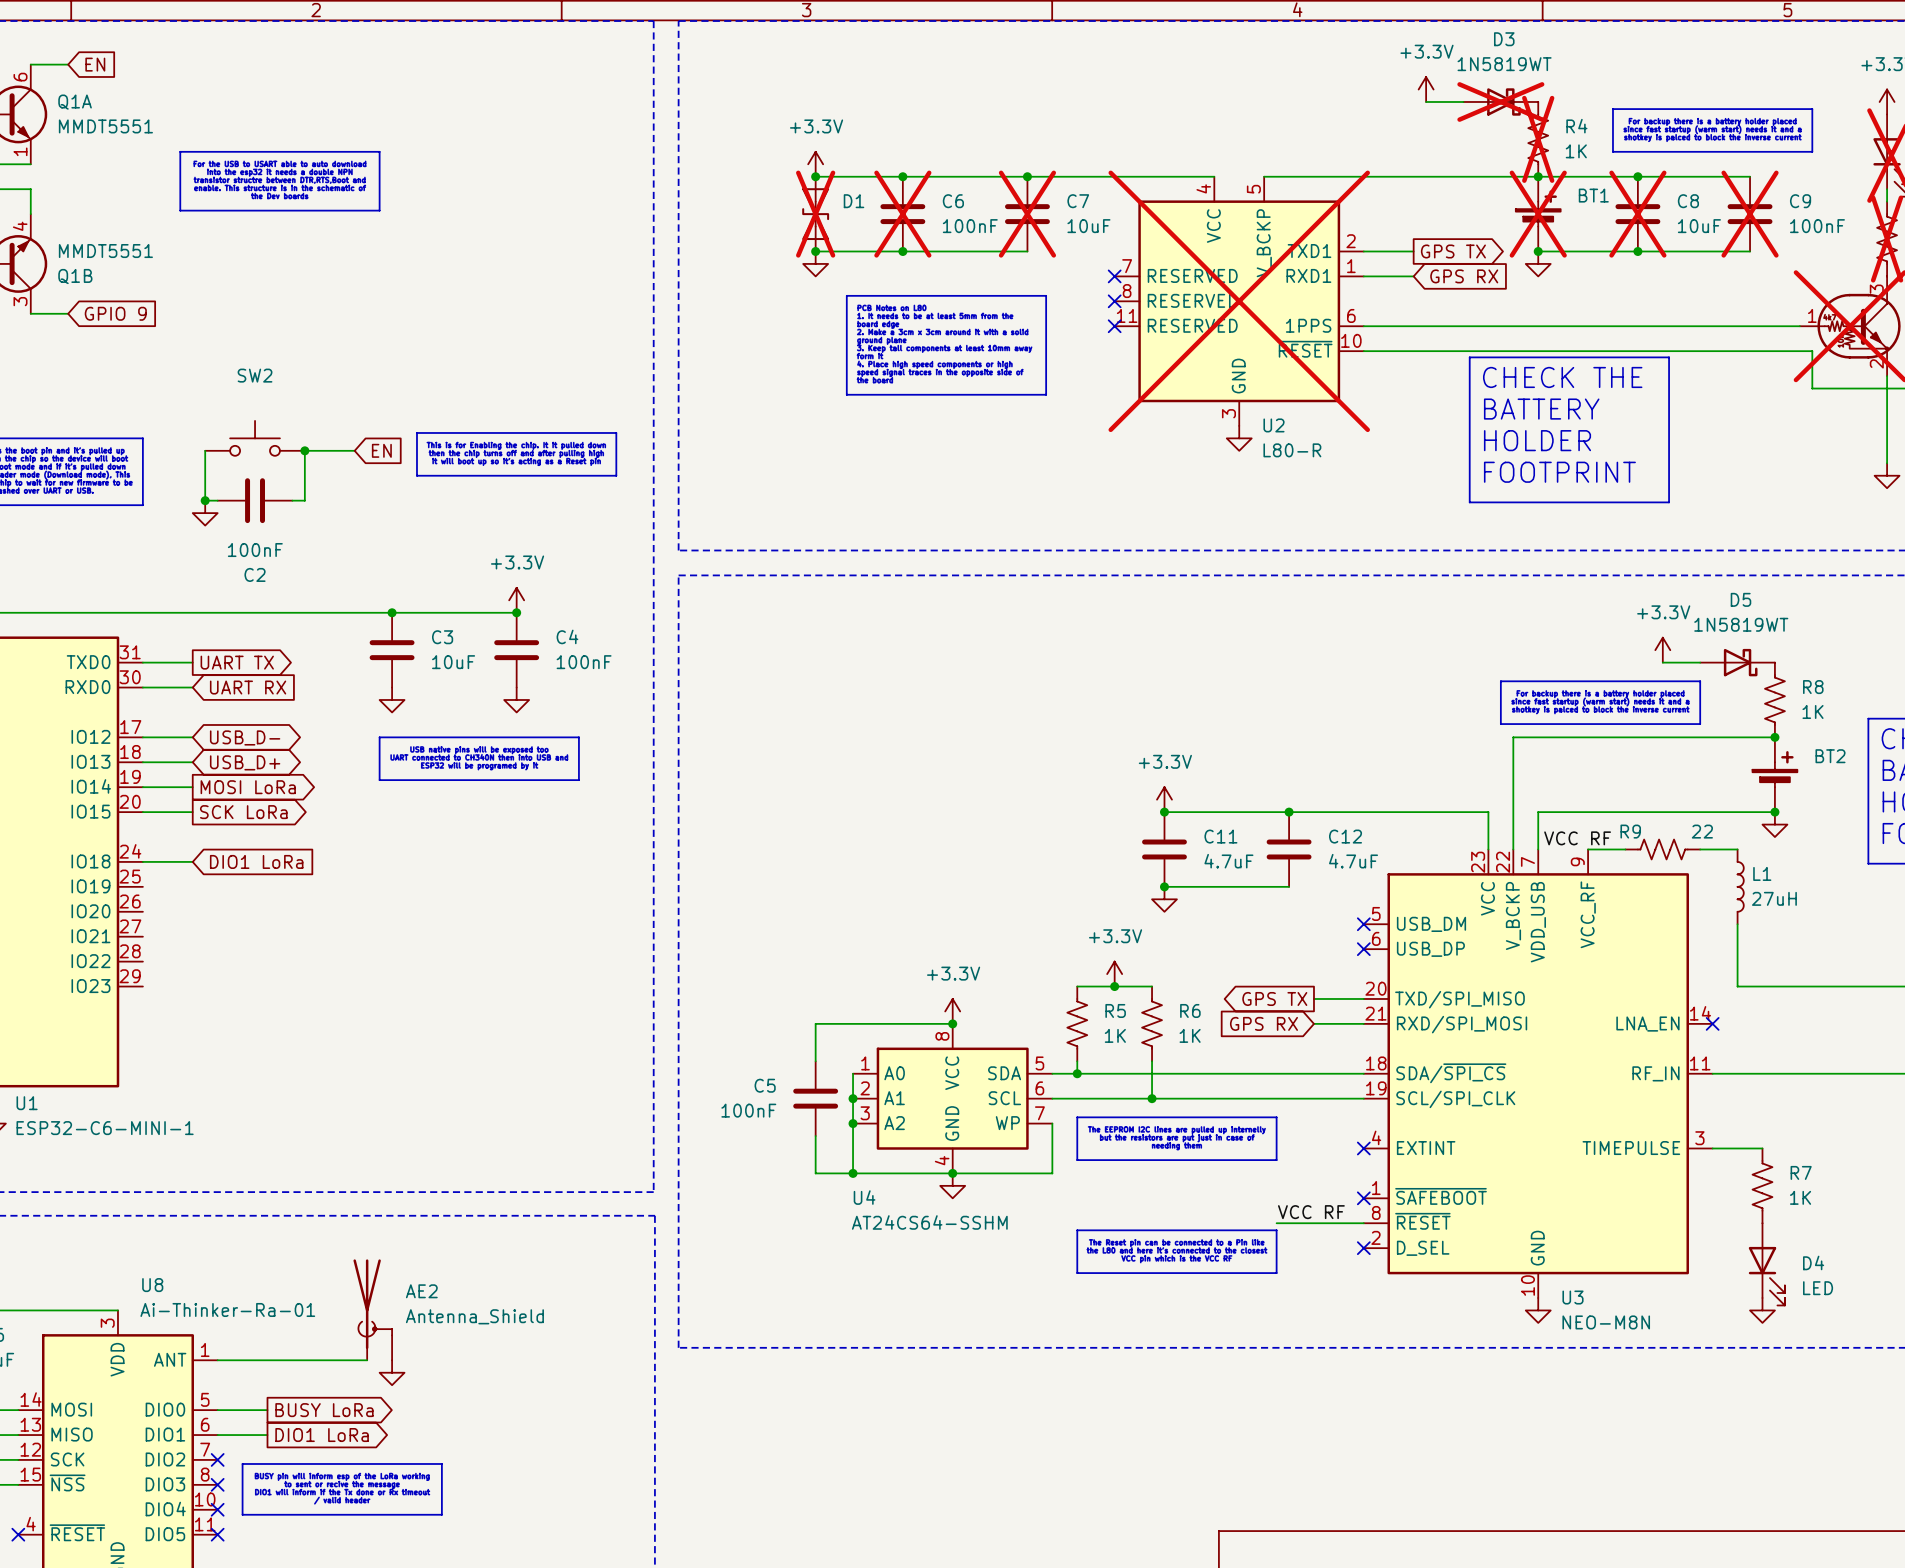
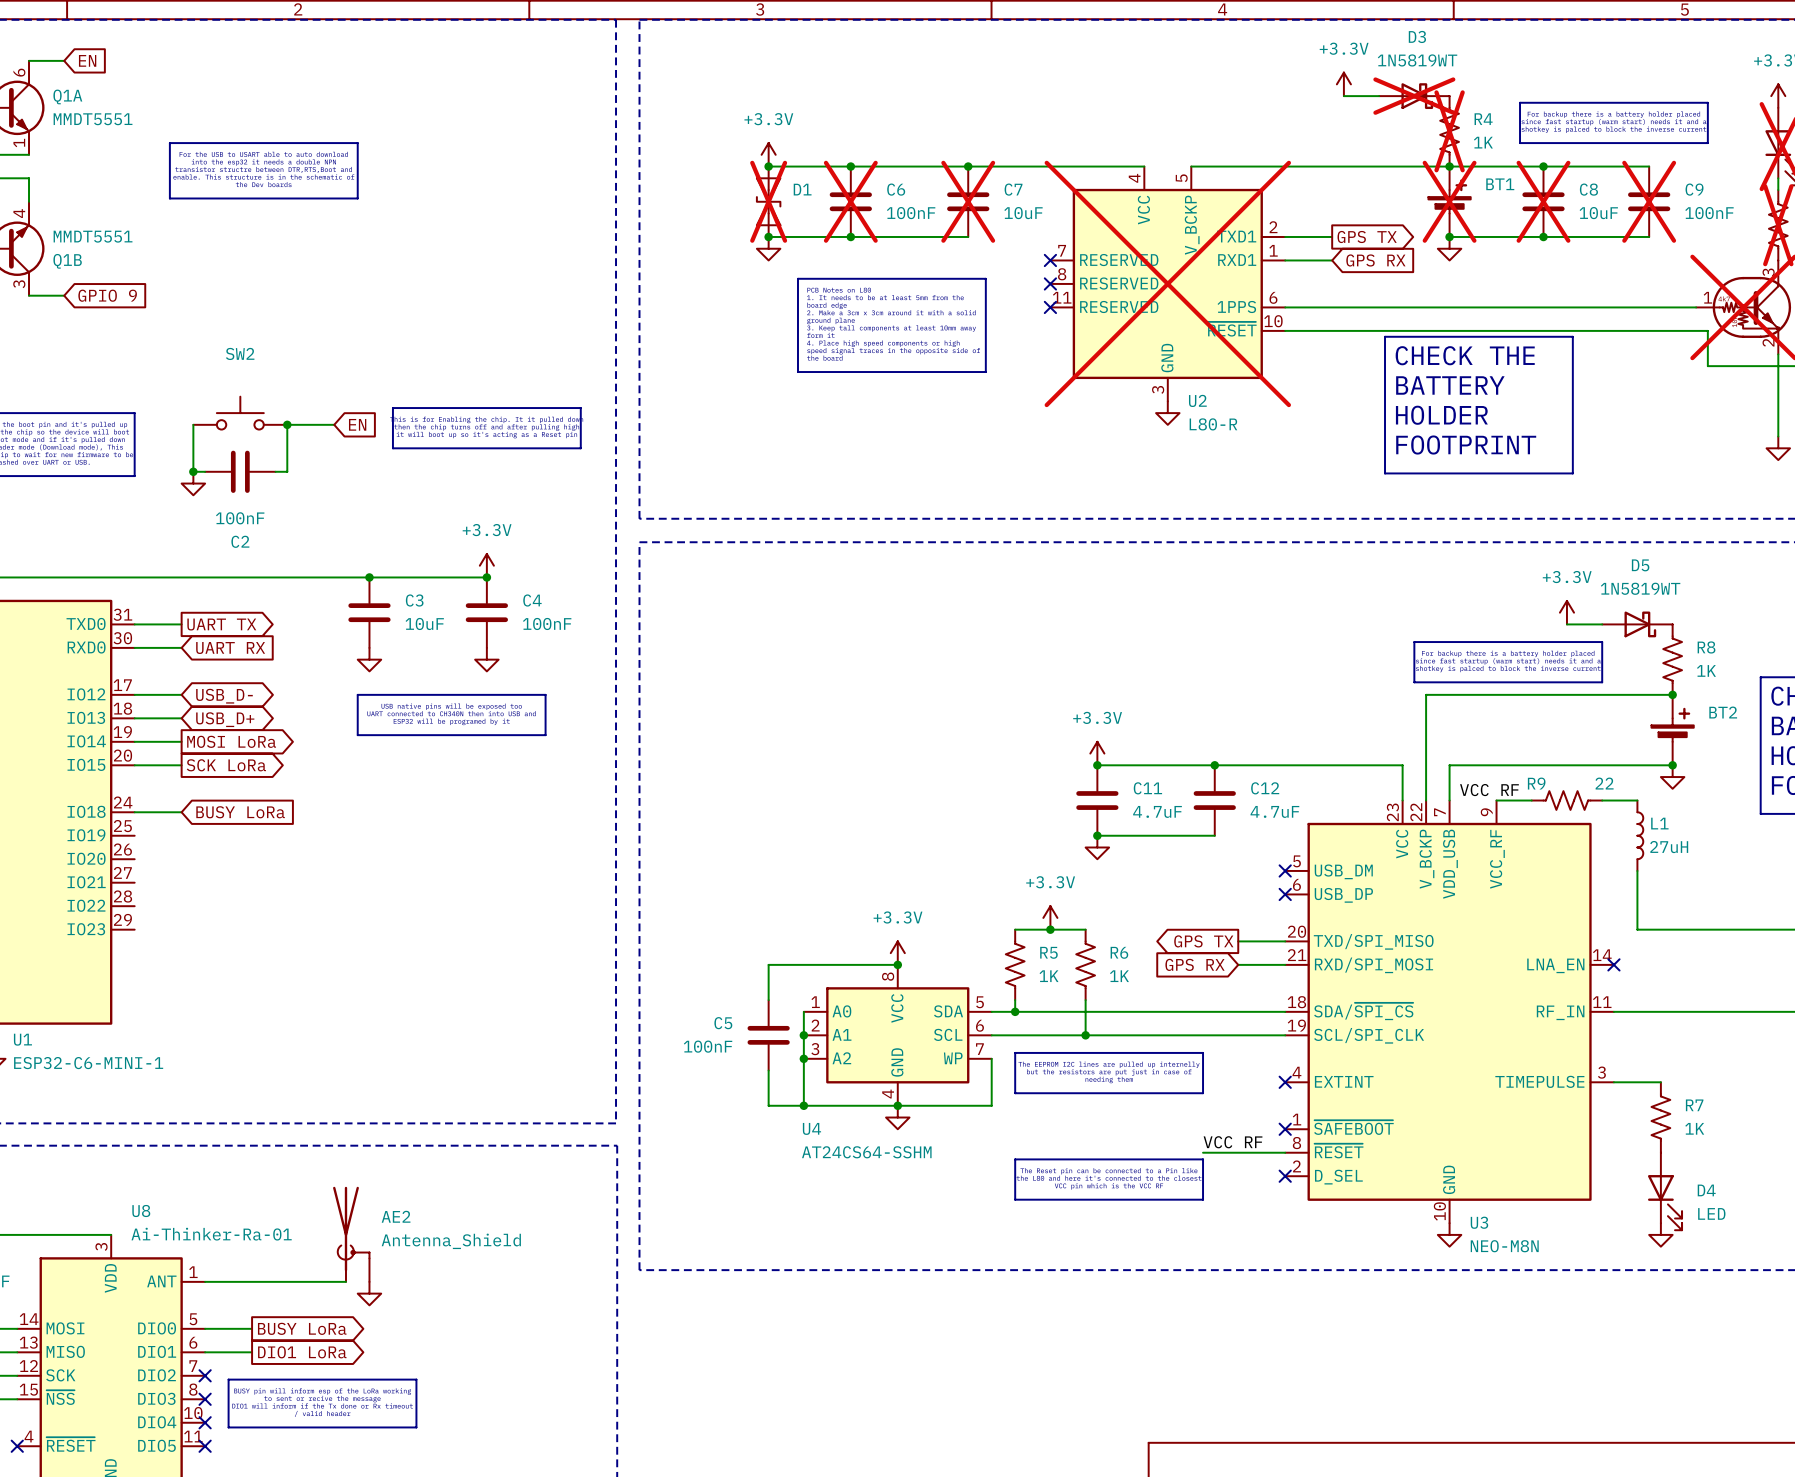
global label: DIO1 LoRa (256, 861) -> BUSY LoRa (240, 812)

